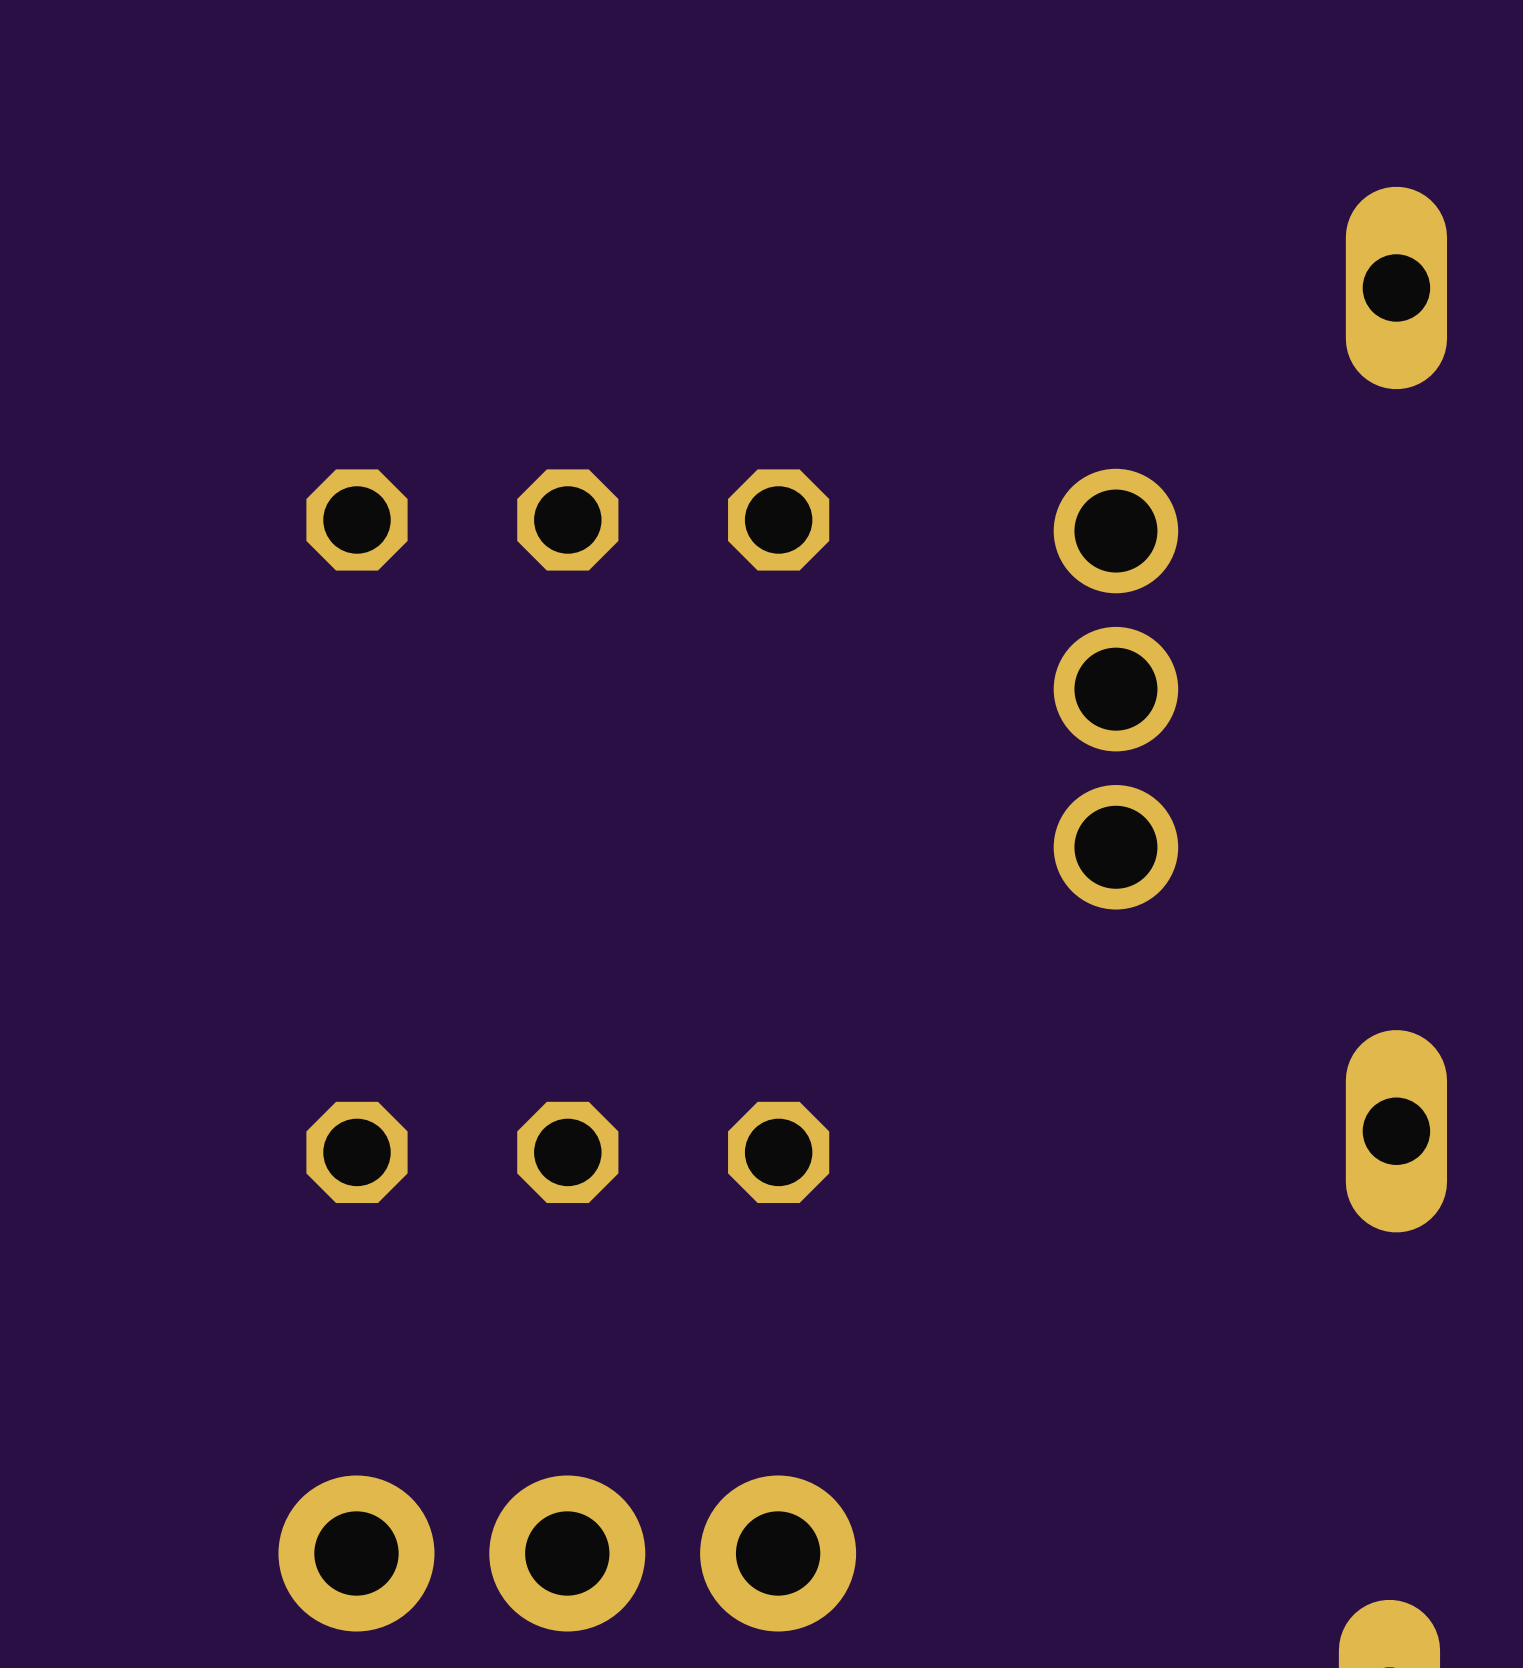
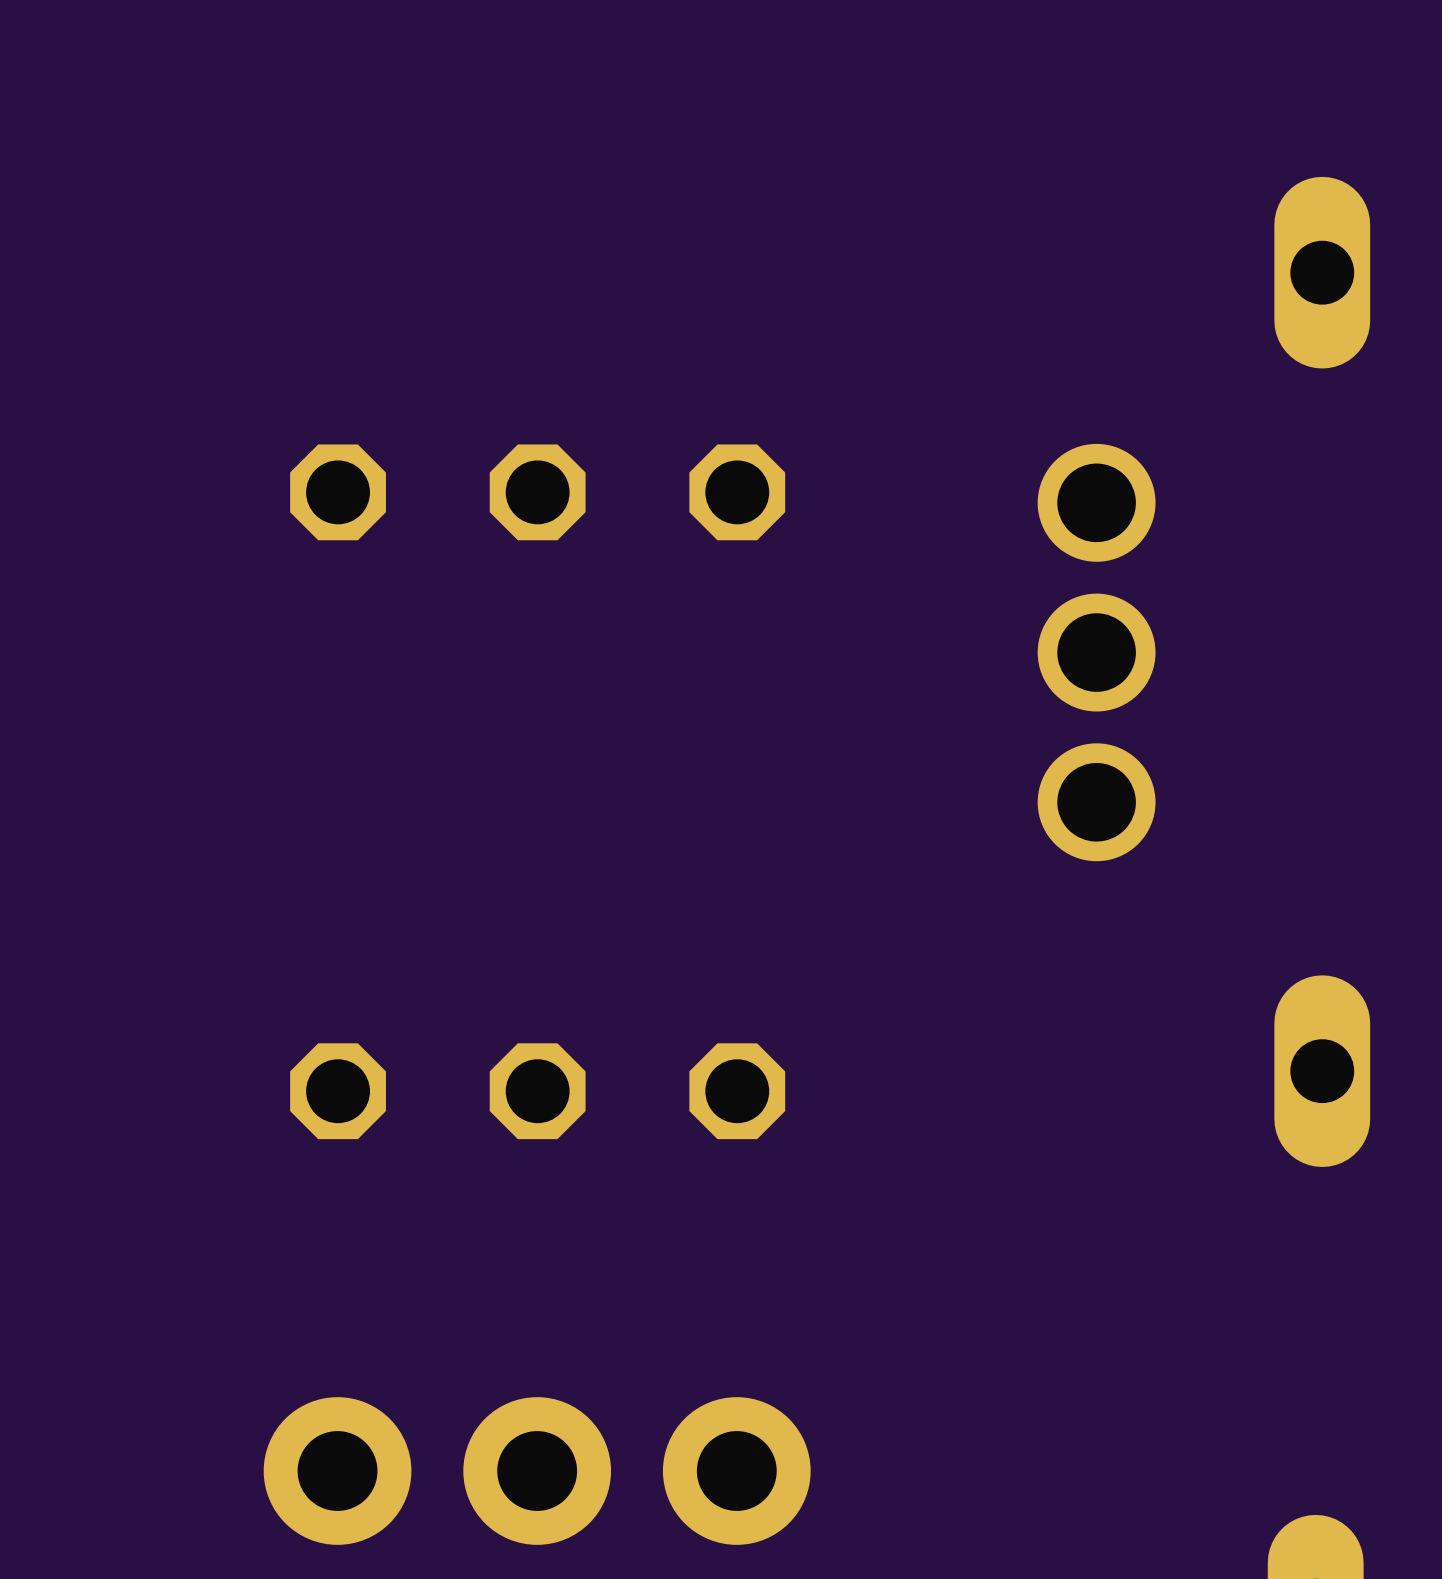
part position: (1115, 689) -> (1096, 652)

